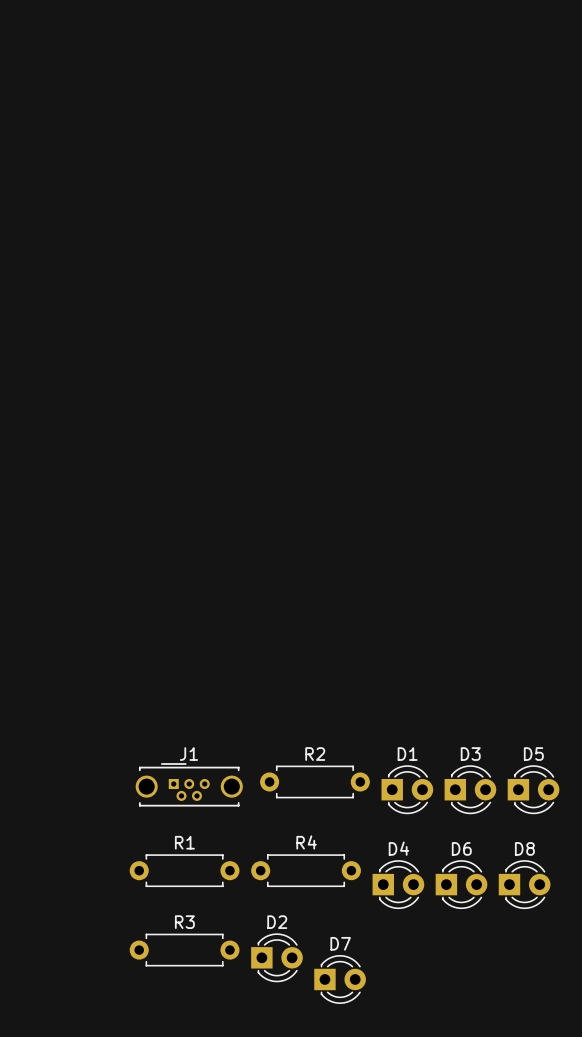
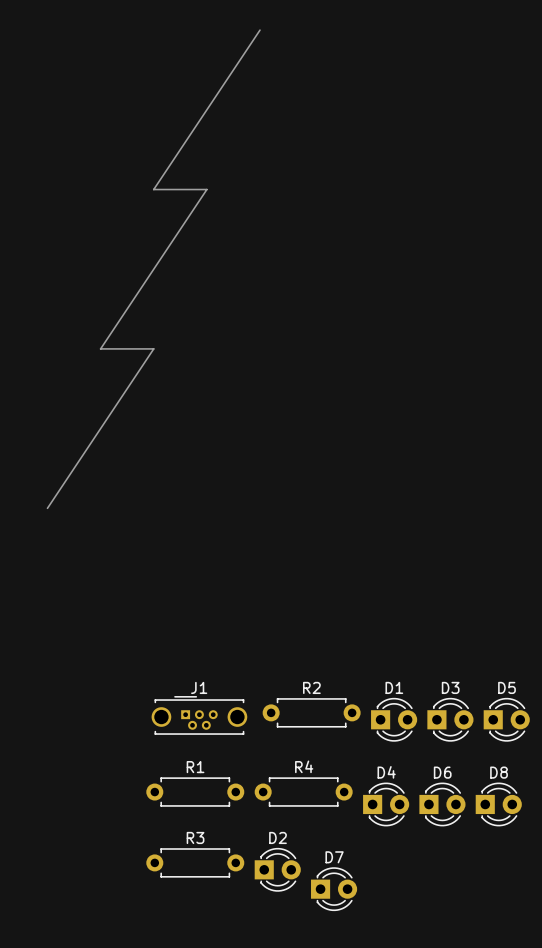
board edge: none -> (260, 30) (153, 189) (206, 189) (100, 348) (153, 348) (47, 508)

